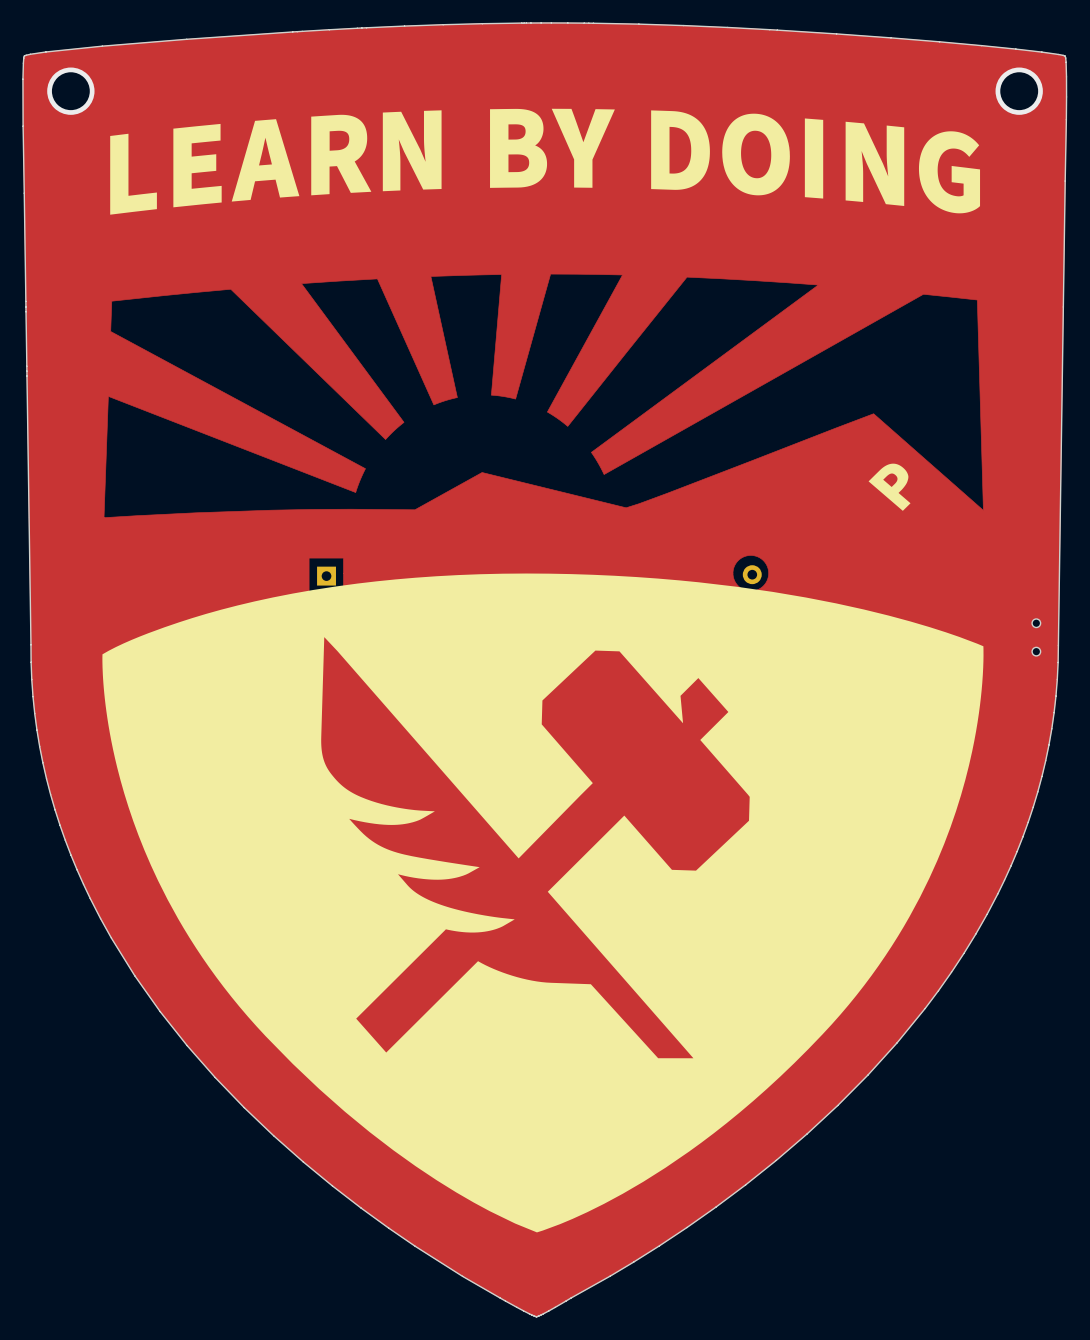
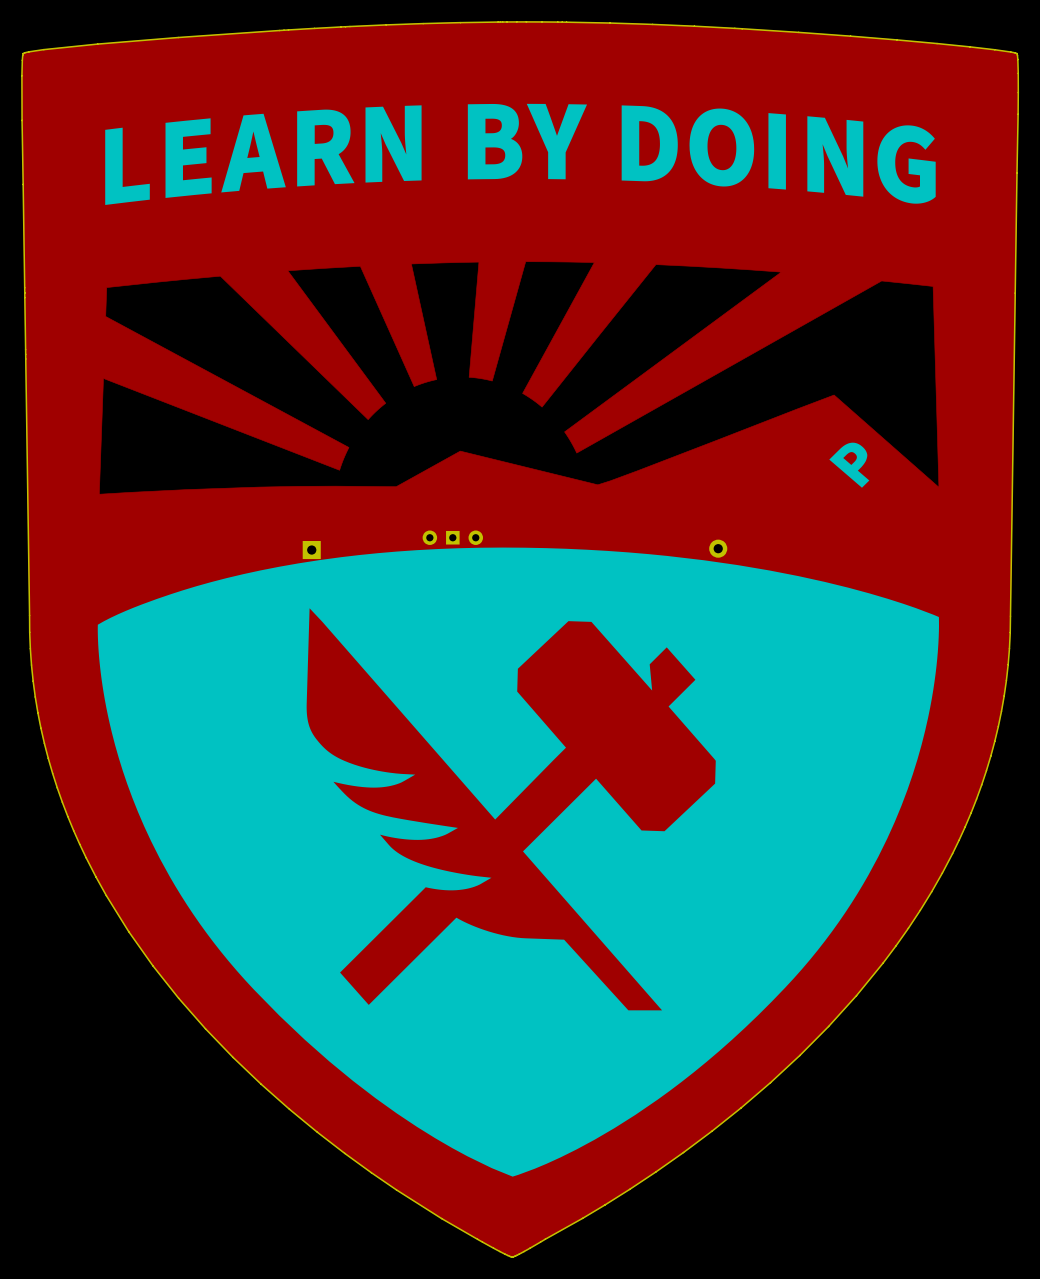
drawing shape: [22, 22, 1067, 1318] -> [21, 21, 1019, 1258]
via: (70, 91) -> none
via: (1019, 91) -> none
part: none -> (452, 537)
part: (1036, 637) -> none

